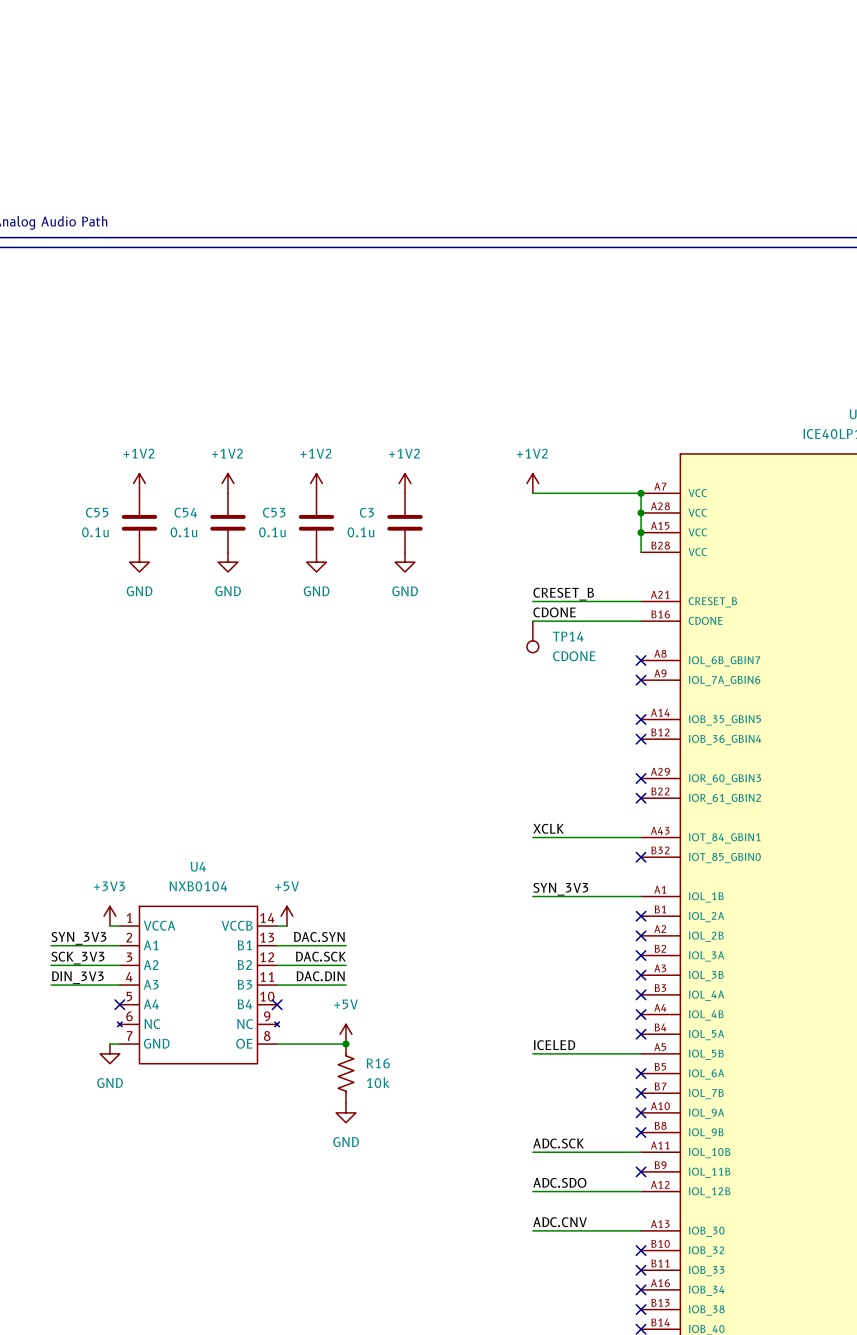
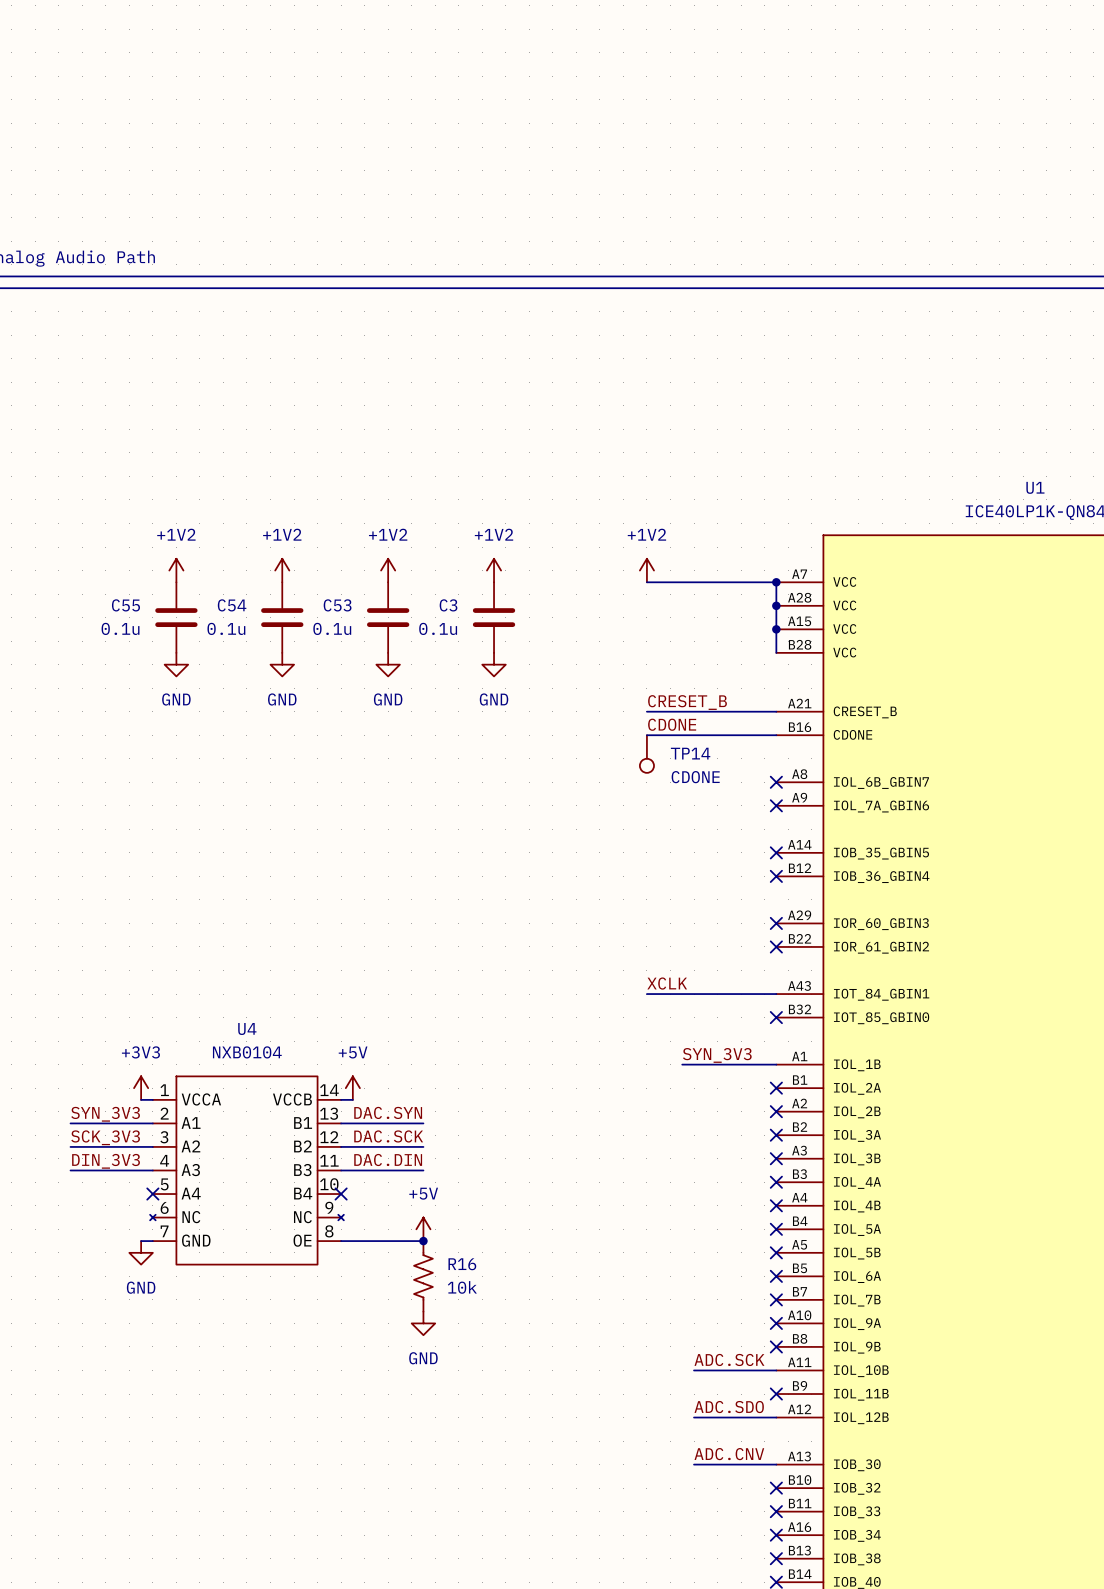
label position: SYN_3V3 (560, 889) -> SYN_3V3 (717, 1055)
wire: (532, 896) (562, 896) -> none
label: ICELED (554, 1045) -> none
wire: (532, 1053) (641, 1053) -> none
no-connect mark: none -> (776, 1252)
label position: ADC.SCK (558, 1143) -> ADC.SCK (729, 1359)
wire: (532, 1152) (572, 1152) -> none
label position: ADC.SDO (559, 1182) -> ADC.SDO (729, 1407)
wire: (532, 1191) (572, 1191) -> none
label position: ADC.CNV (560, 1222) -> ADC.CNV (729, 1454)
wire: (532, 1230) (572, 1230) -> none

